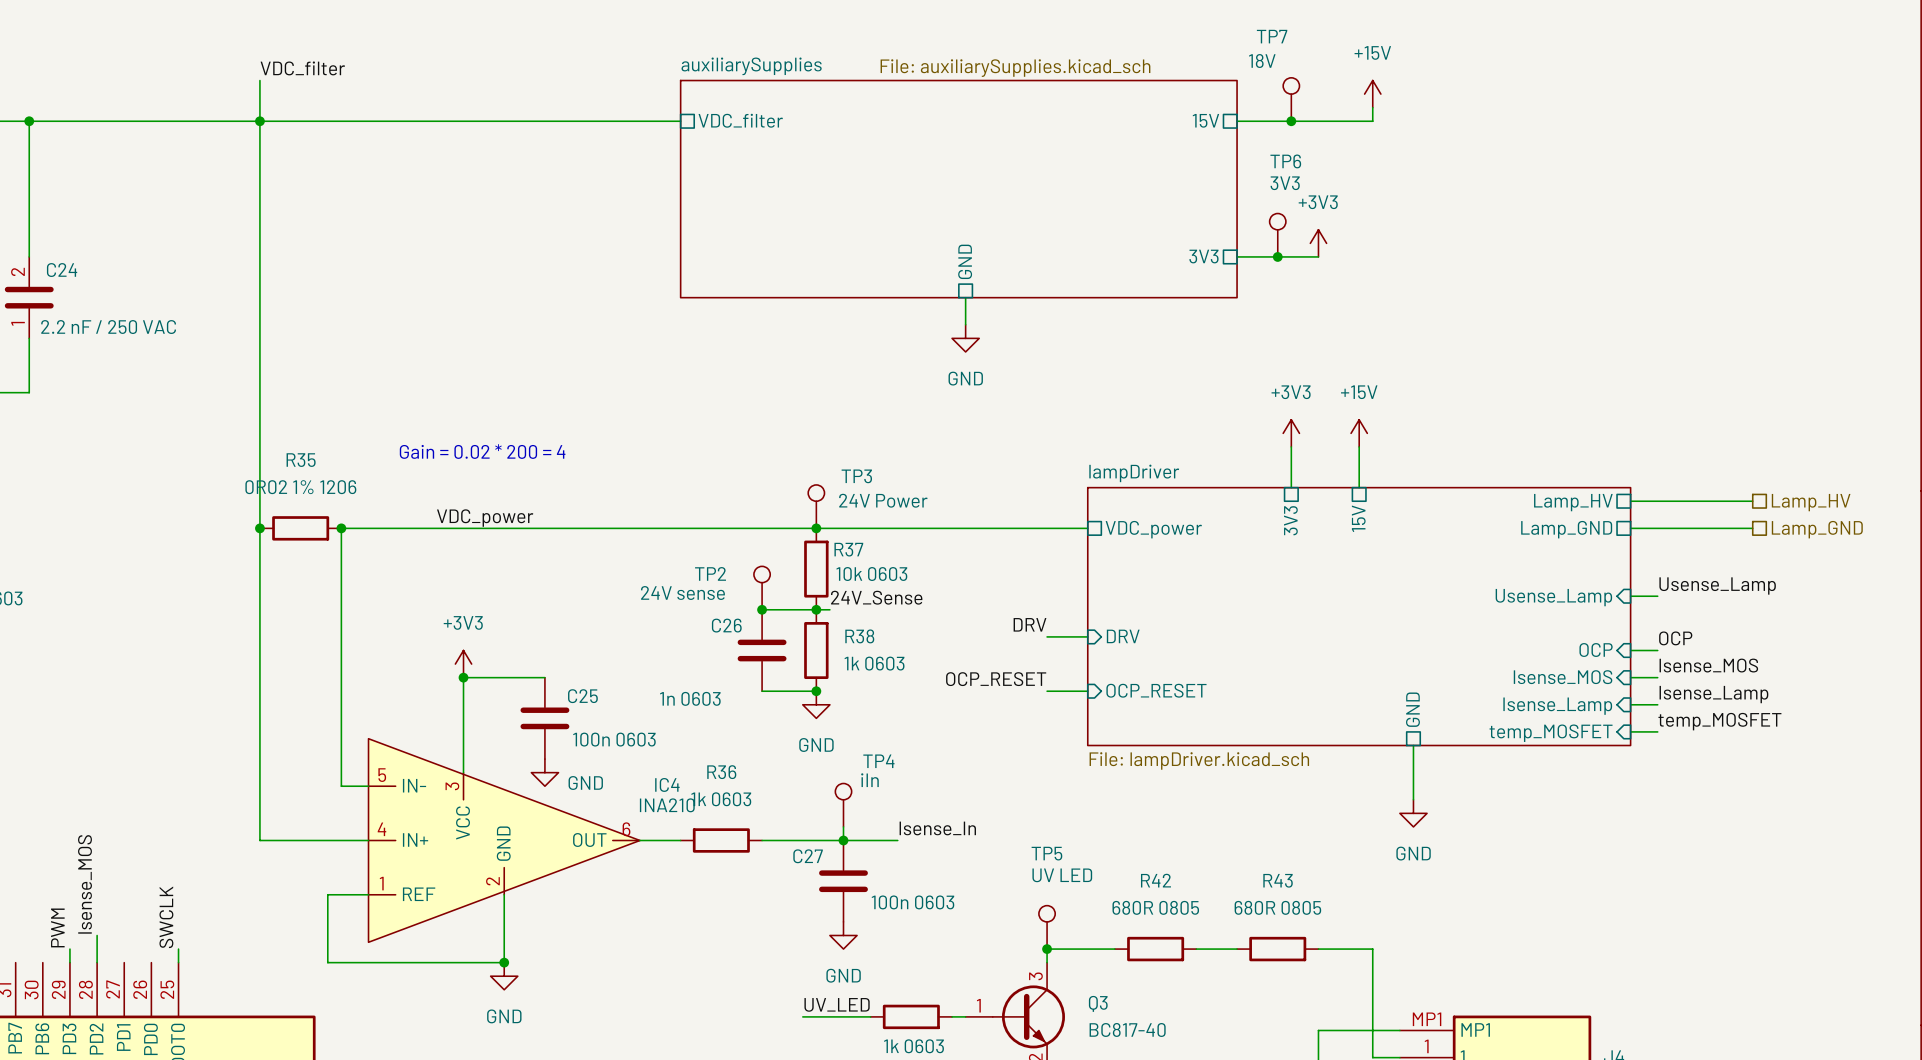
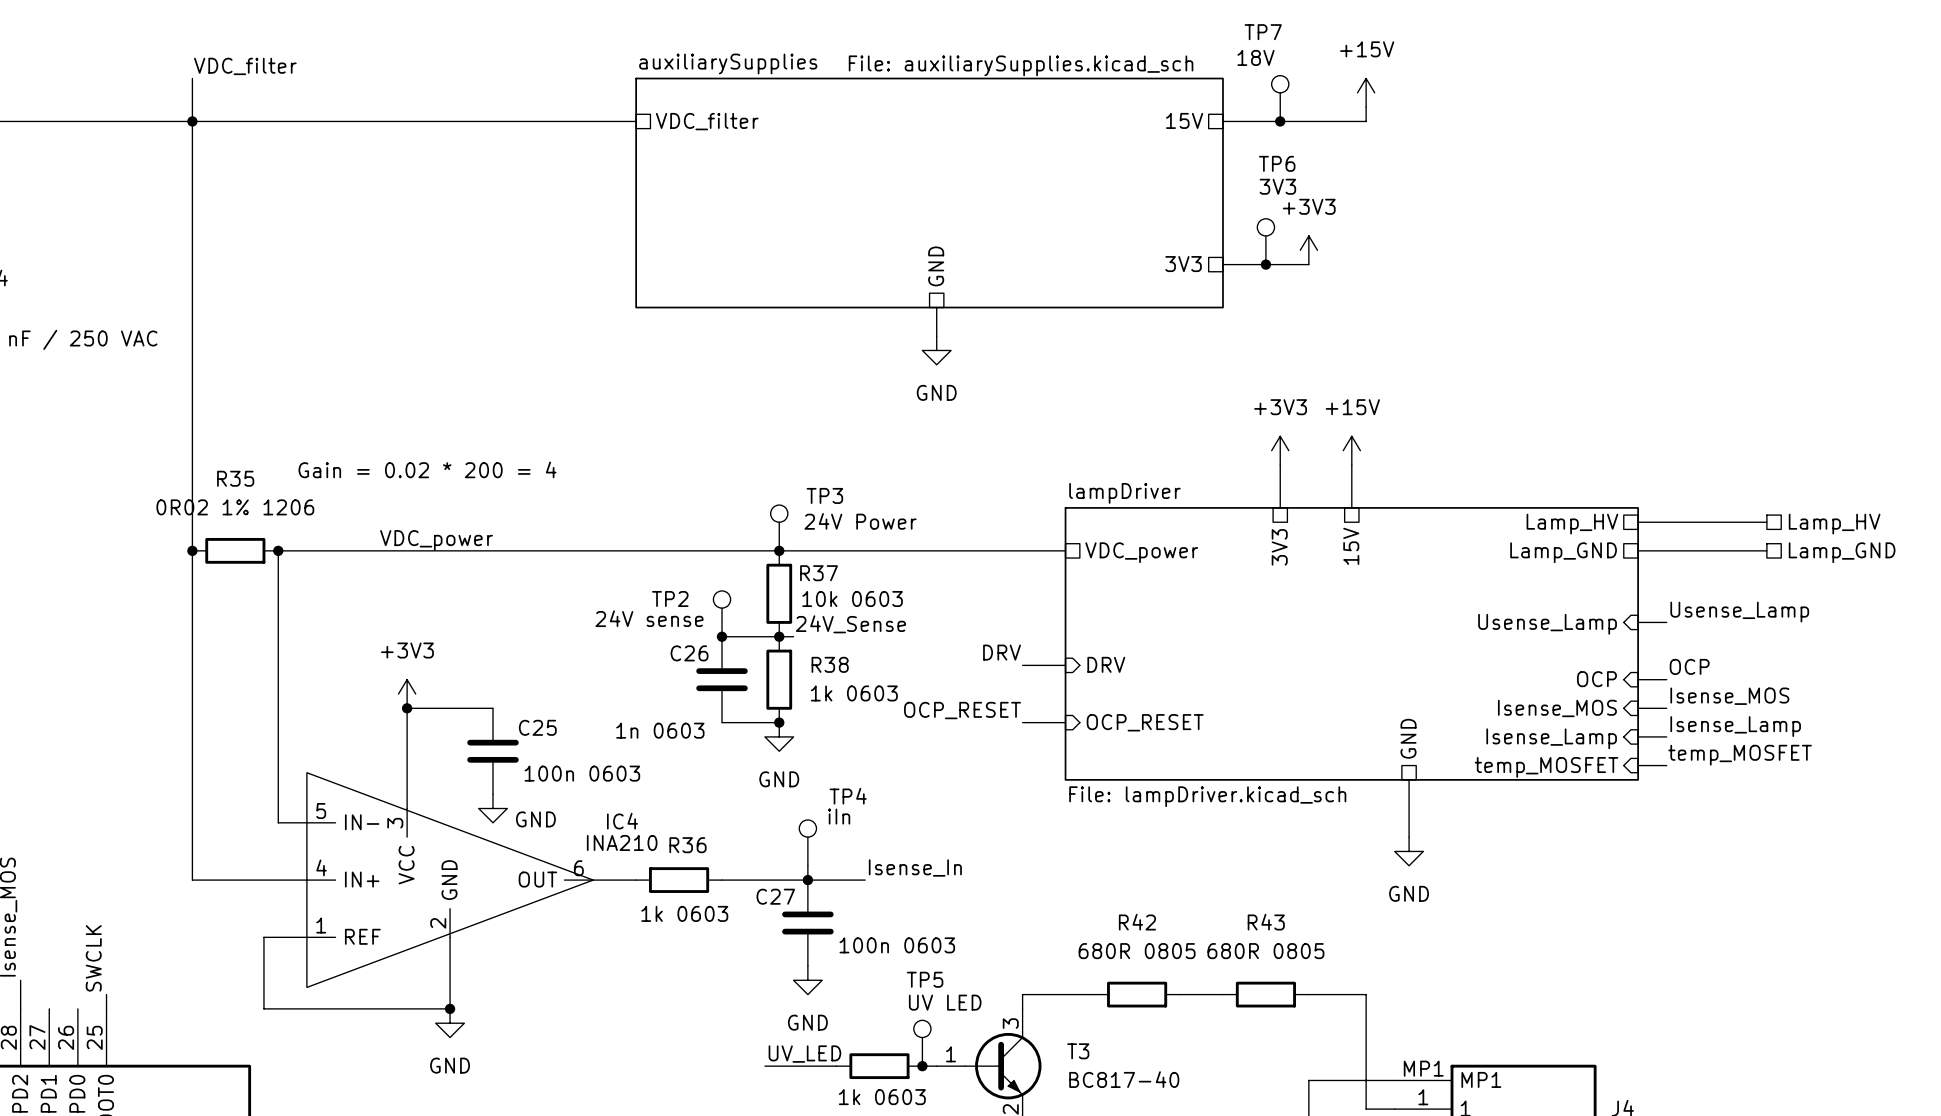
R36 name position: R36 (721, 772) -> R36 (687, 845)
R36 value position: 1k 0603 (721, 799) -> 1k 0603 (684, 913)
TP5 name position: TP5 (1046, 853) -> TP5 (925, 979)
TP5 value position: UV LED (1062, 875) -> UV LED (945, 1002)
TP5 position: (1047, 927) -> (922, 1043)
junction: (1047, 949) -> none
Q3 name: Q3 (1098, 1003) -> T3 (1078, 1051)
junction: none -> (922, 1066)

